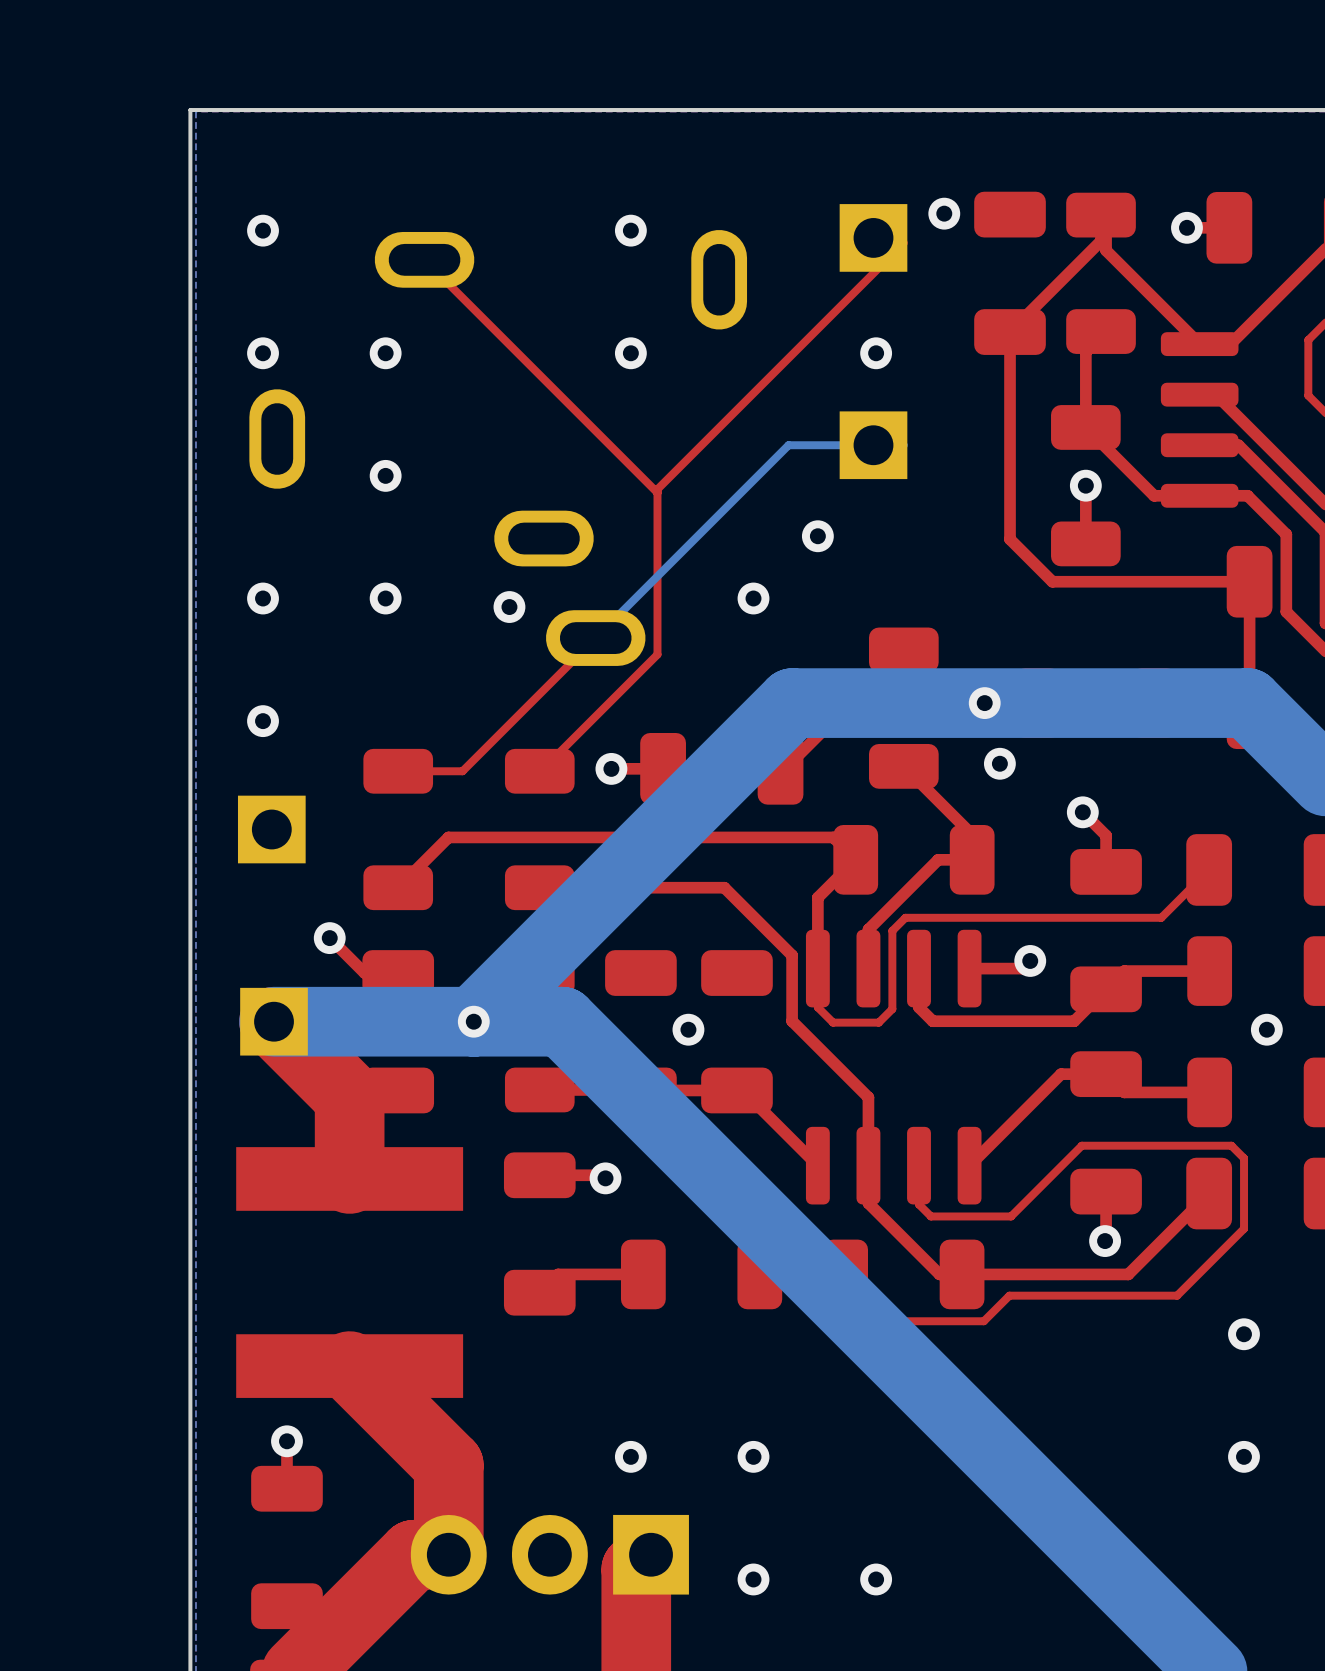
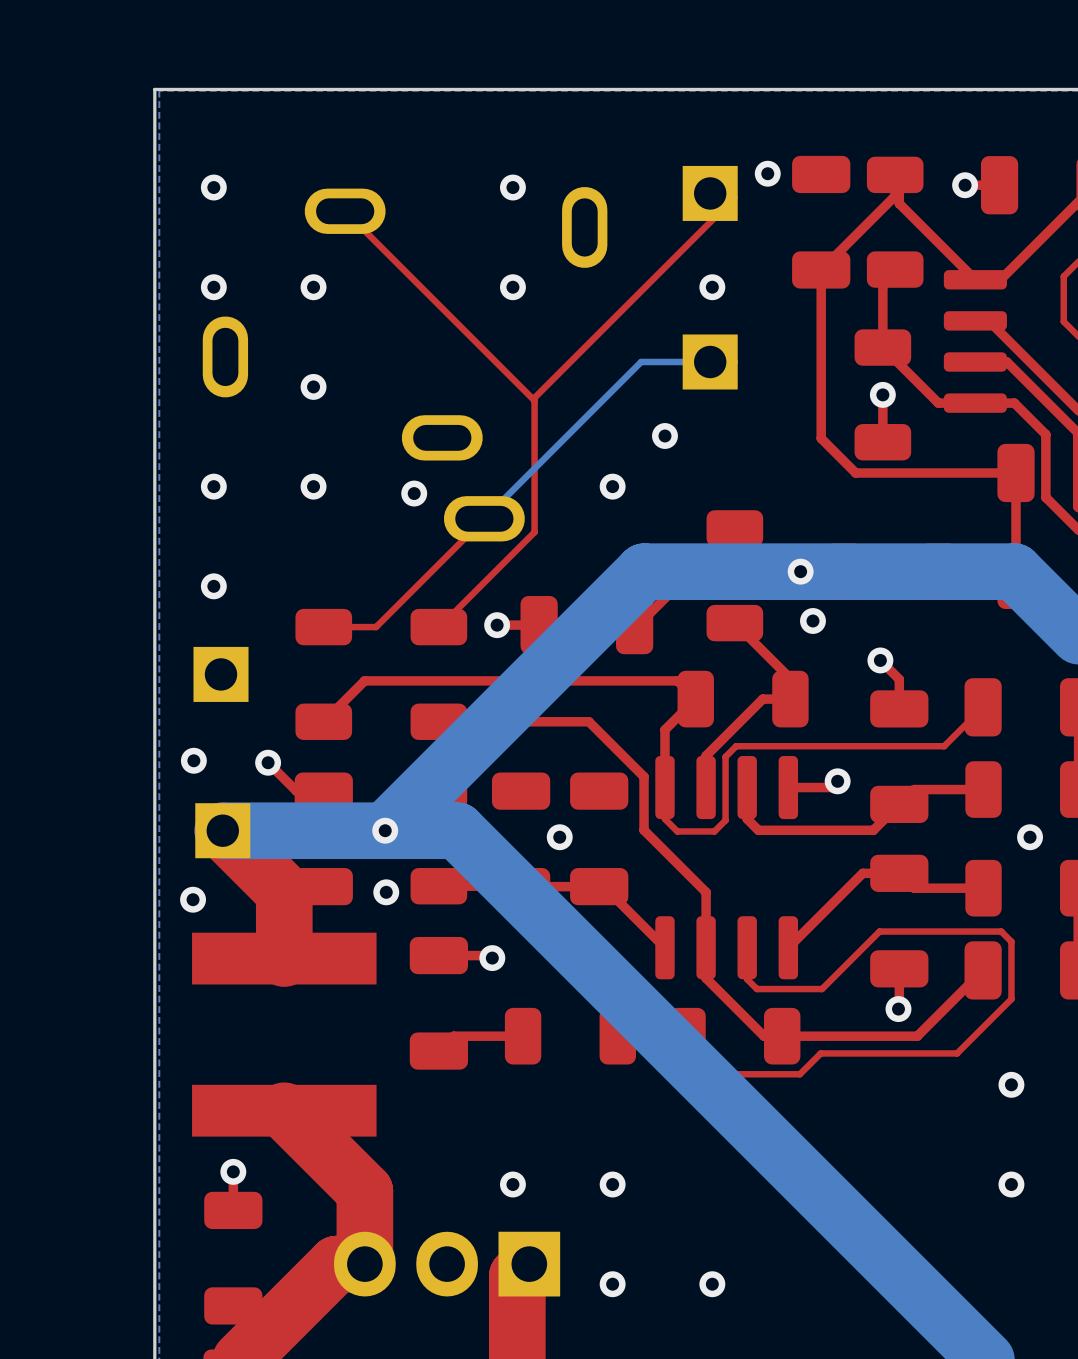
via: none -> (193, 760)
via: none -> (386, 892)
via: none -> (193, 899)

